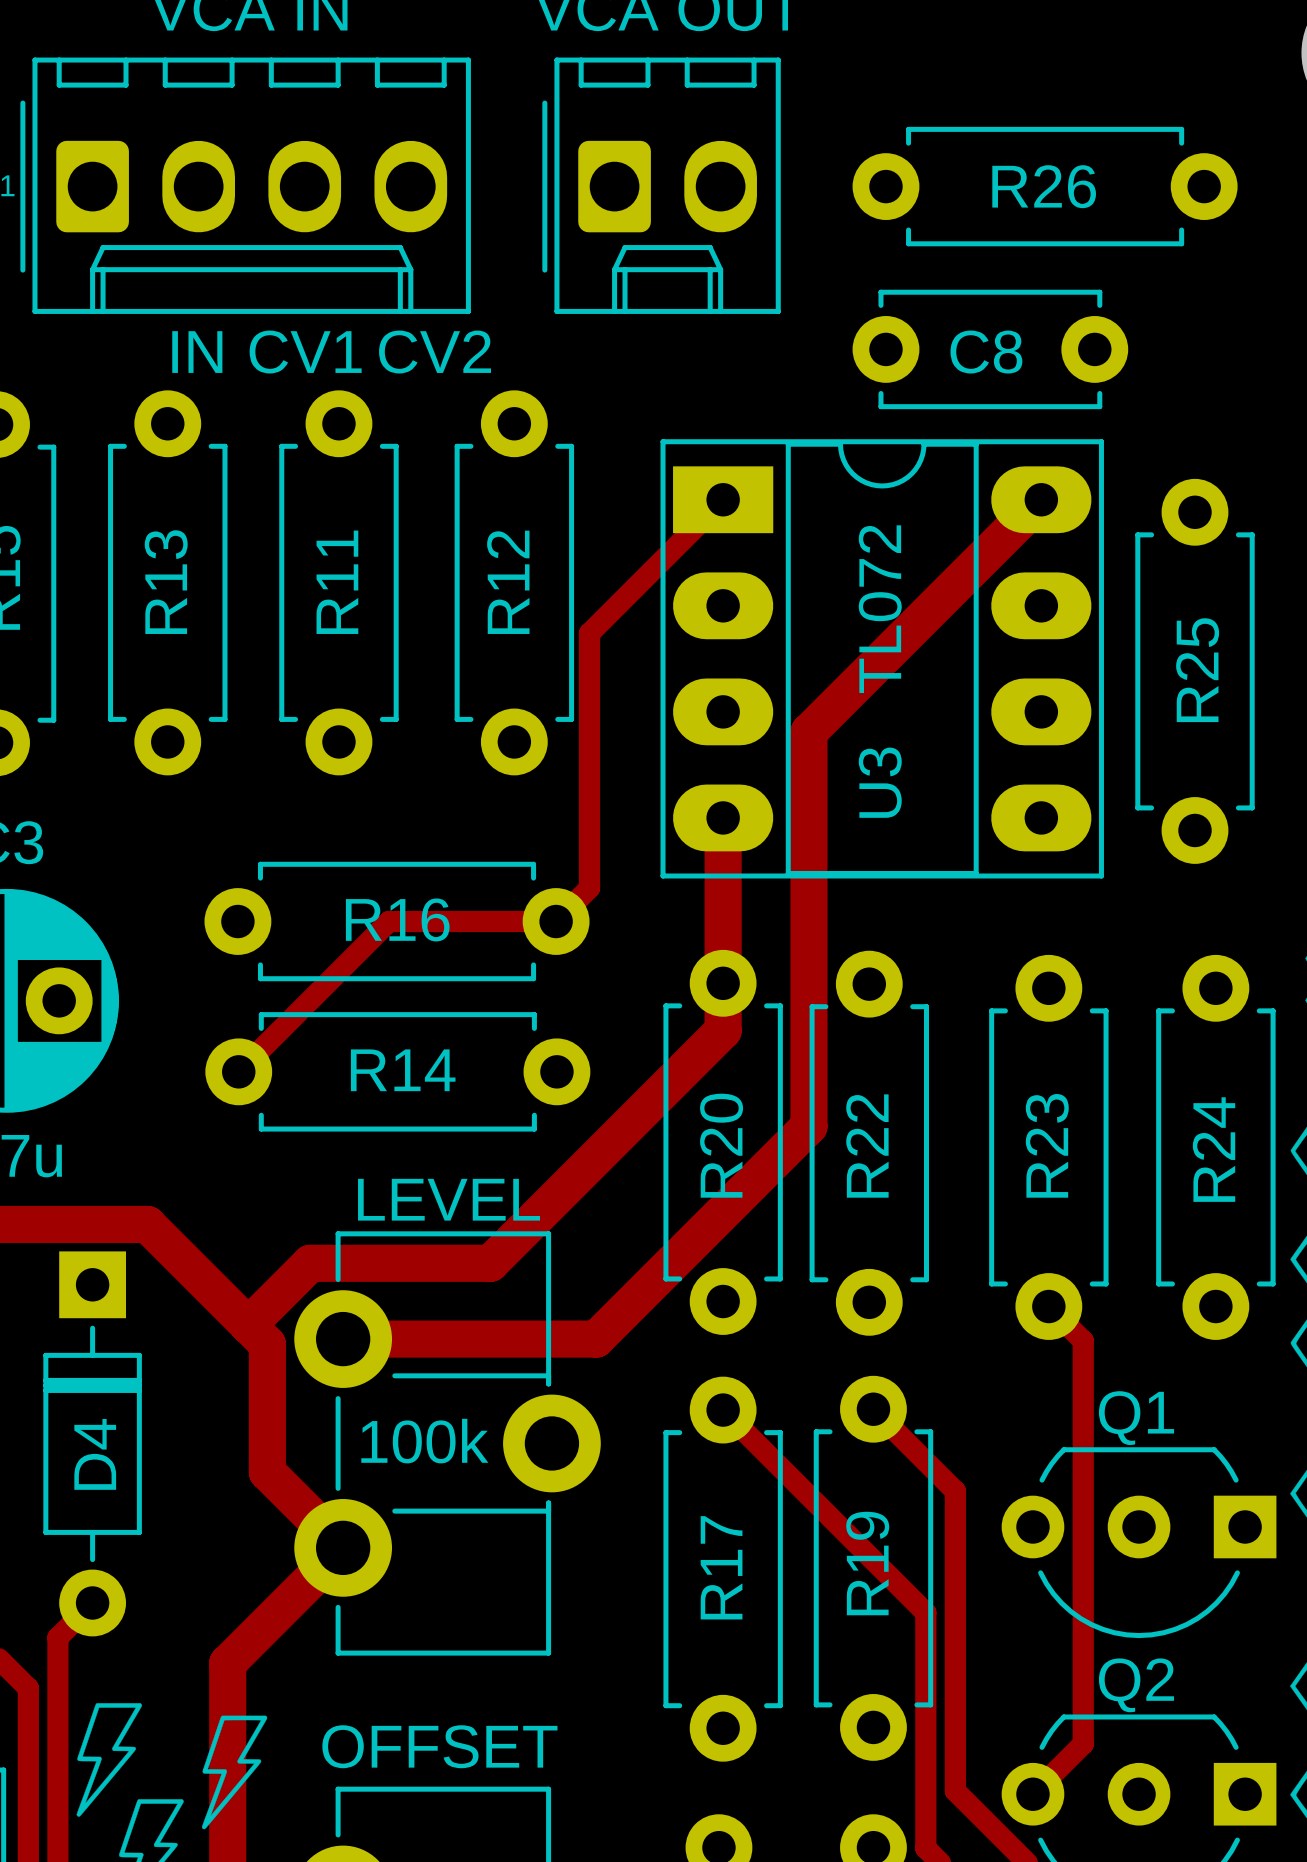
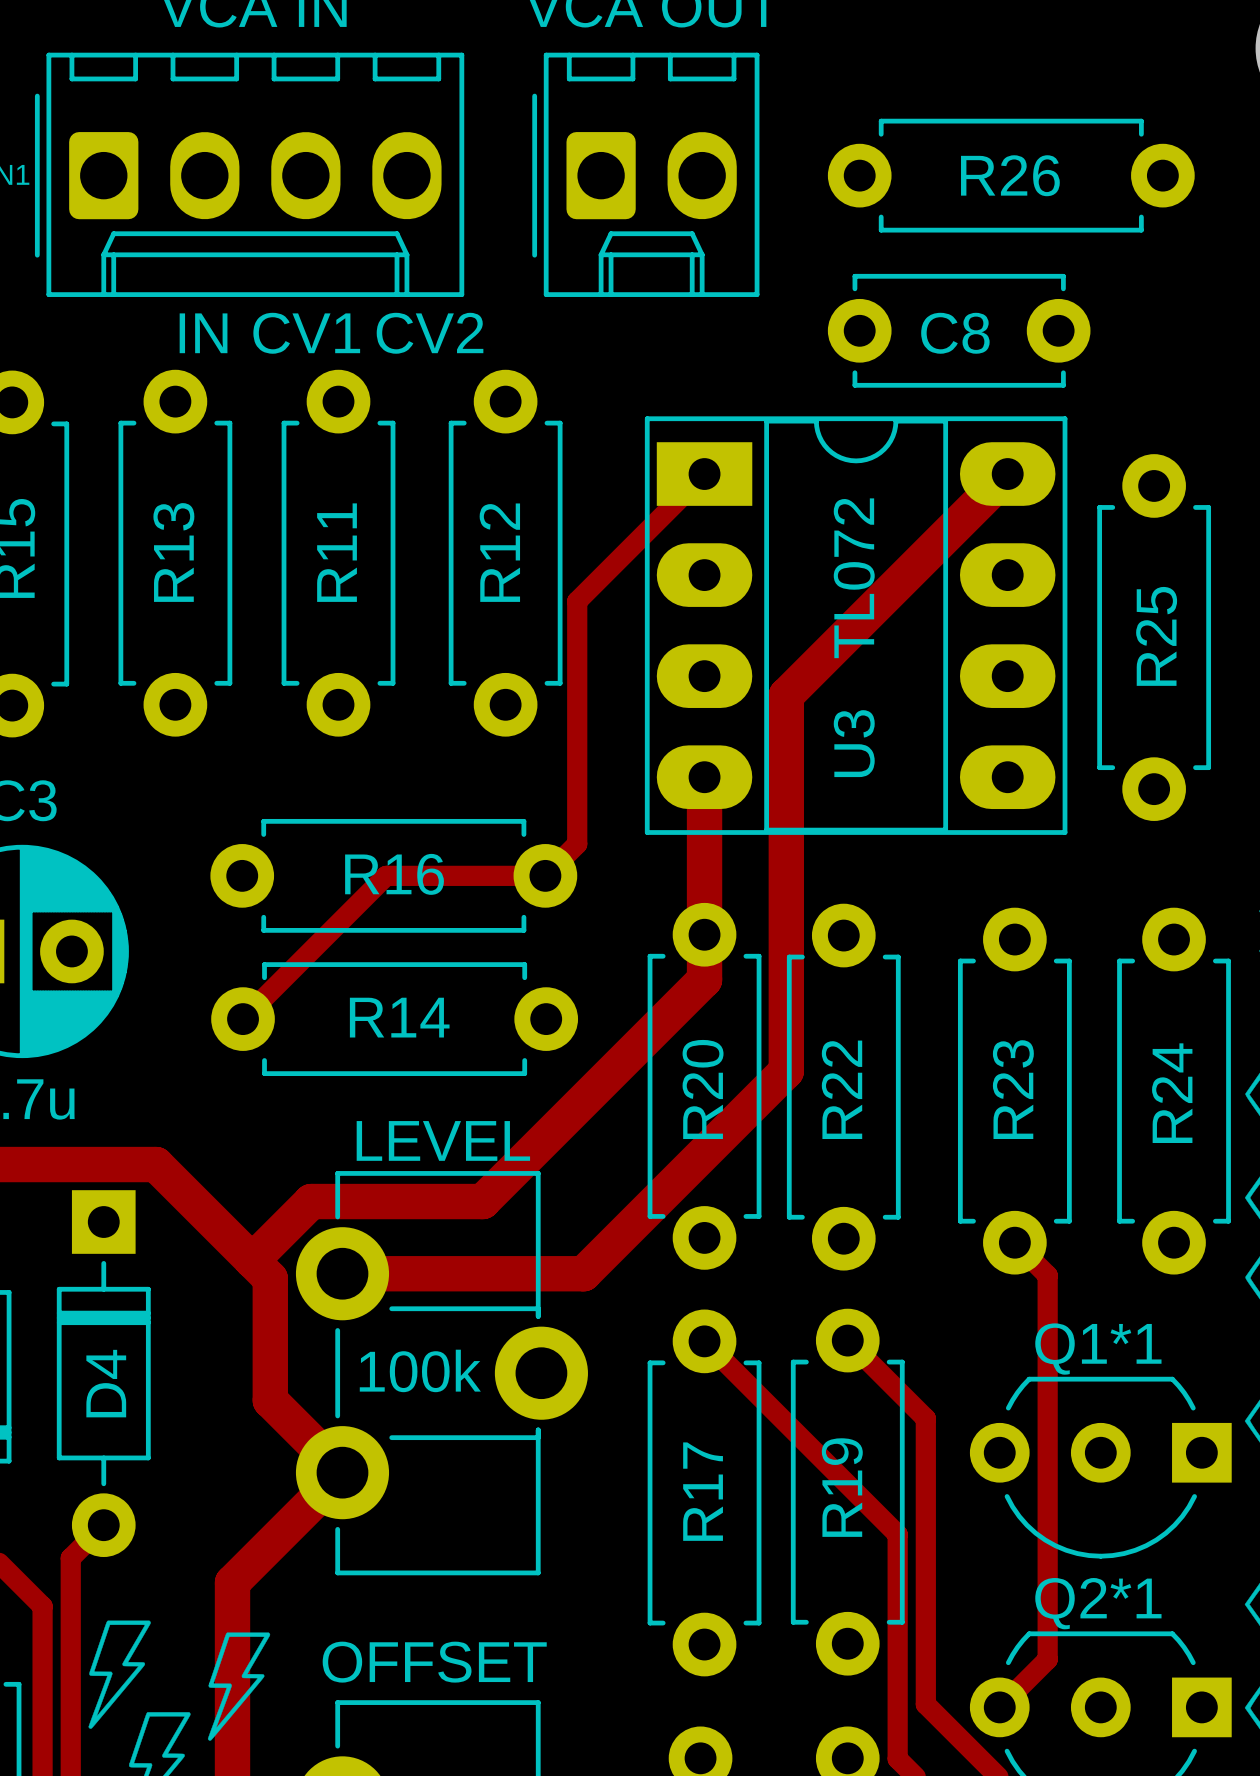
Q1 name: Q1 (1136, 1418) -> Q1*1 (1098, 1349)
Q2 name: Q2 (1136, 1685) -> Q2*1 (1098, 1603)

